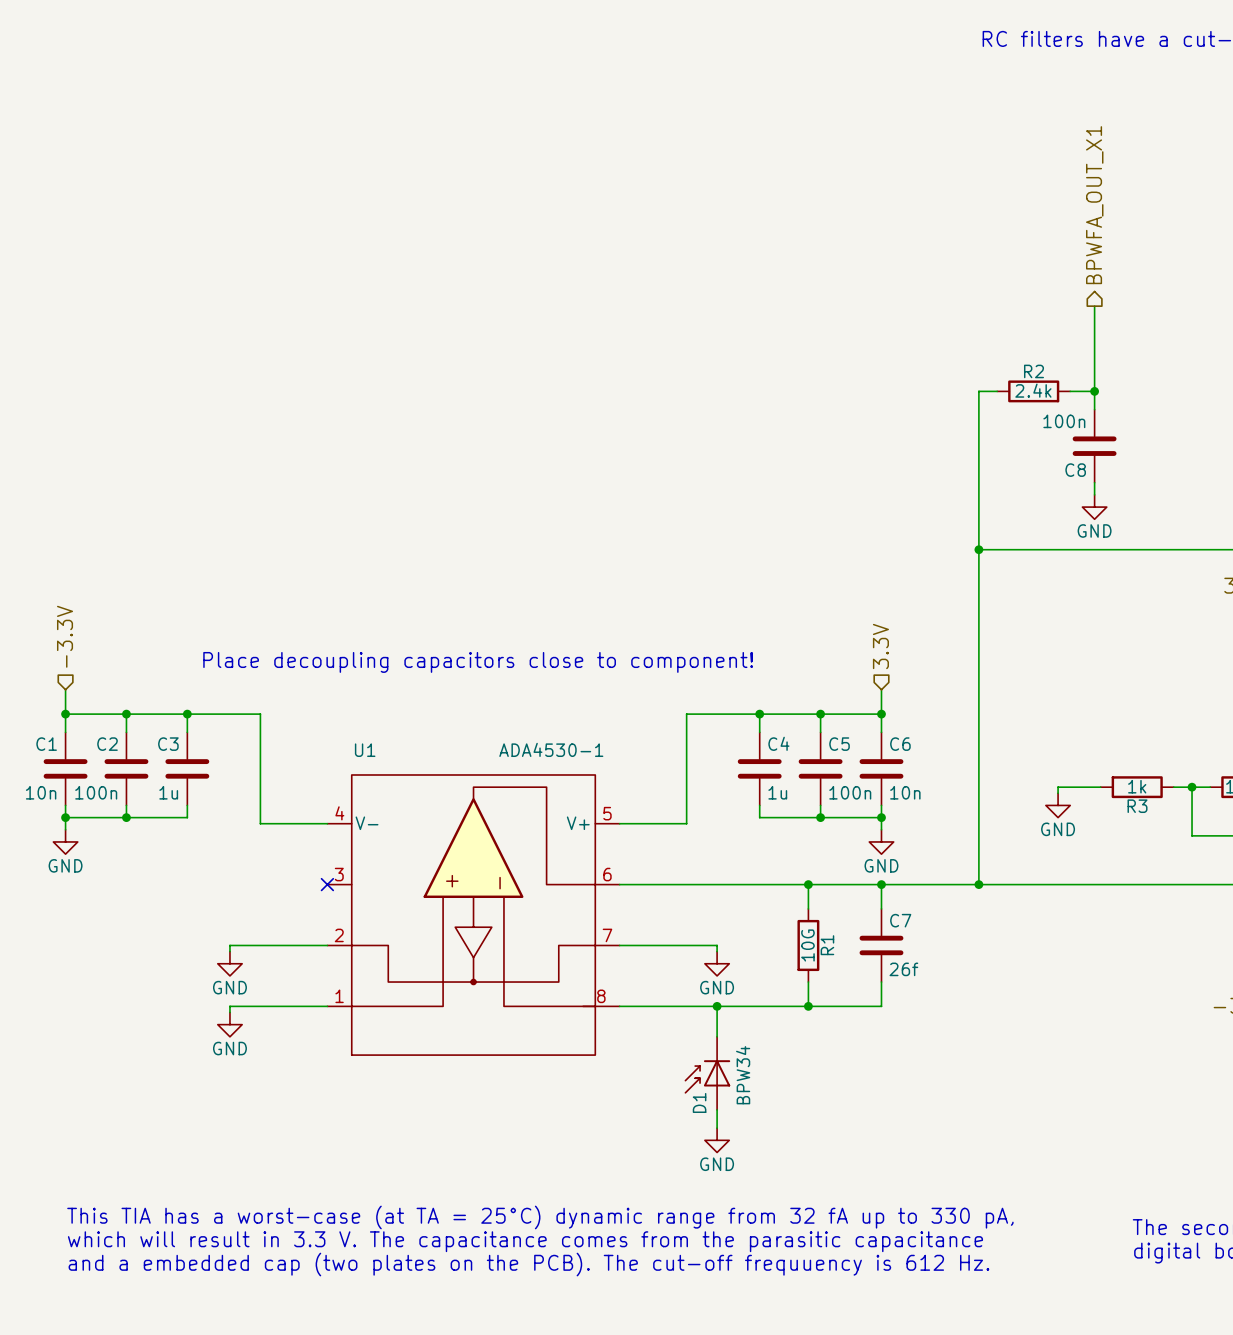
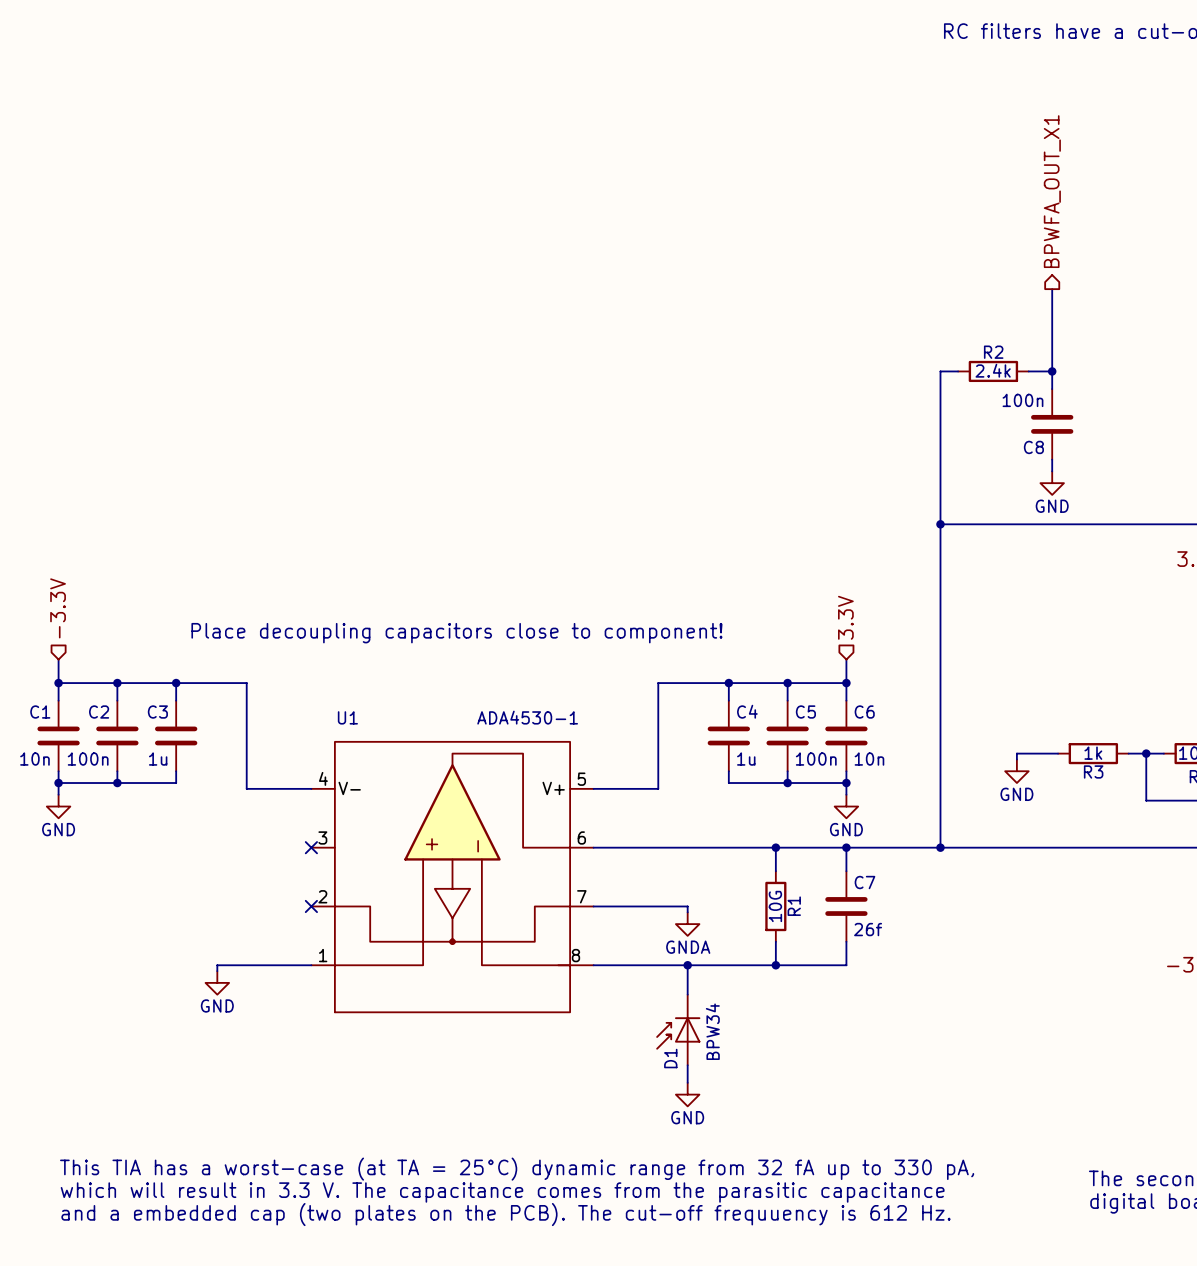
wire: (327, 945) (229, 945) (229, 951) -> none
no-connect mark: none -> (311, 906)
power symbol: GND (229, 963) -> none
power symbol: GND (717, 963) -> GNDA (687, 924)

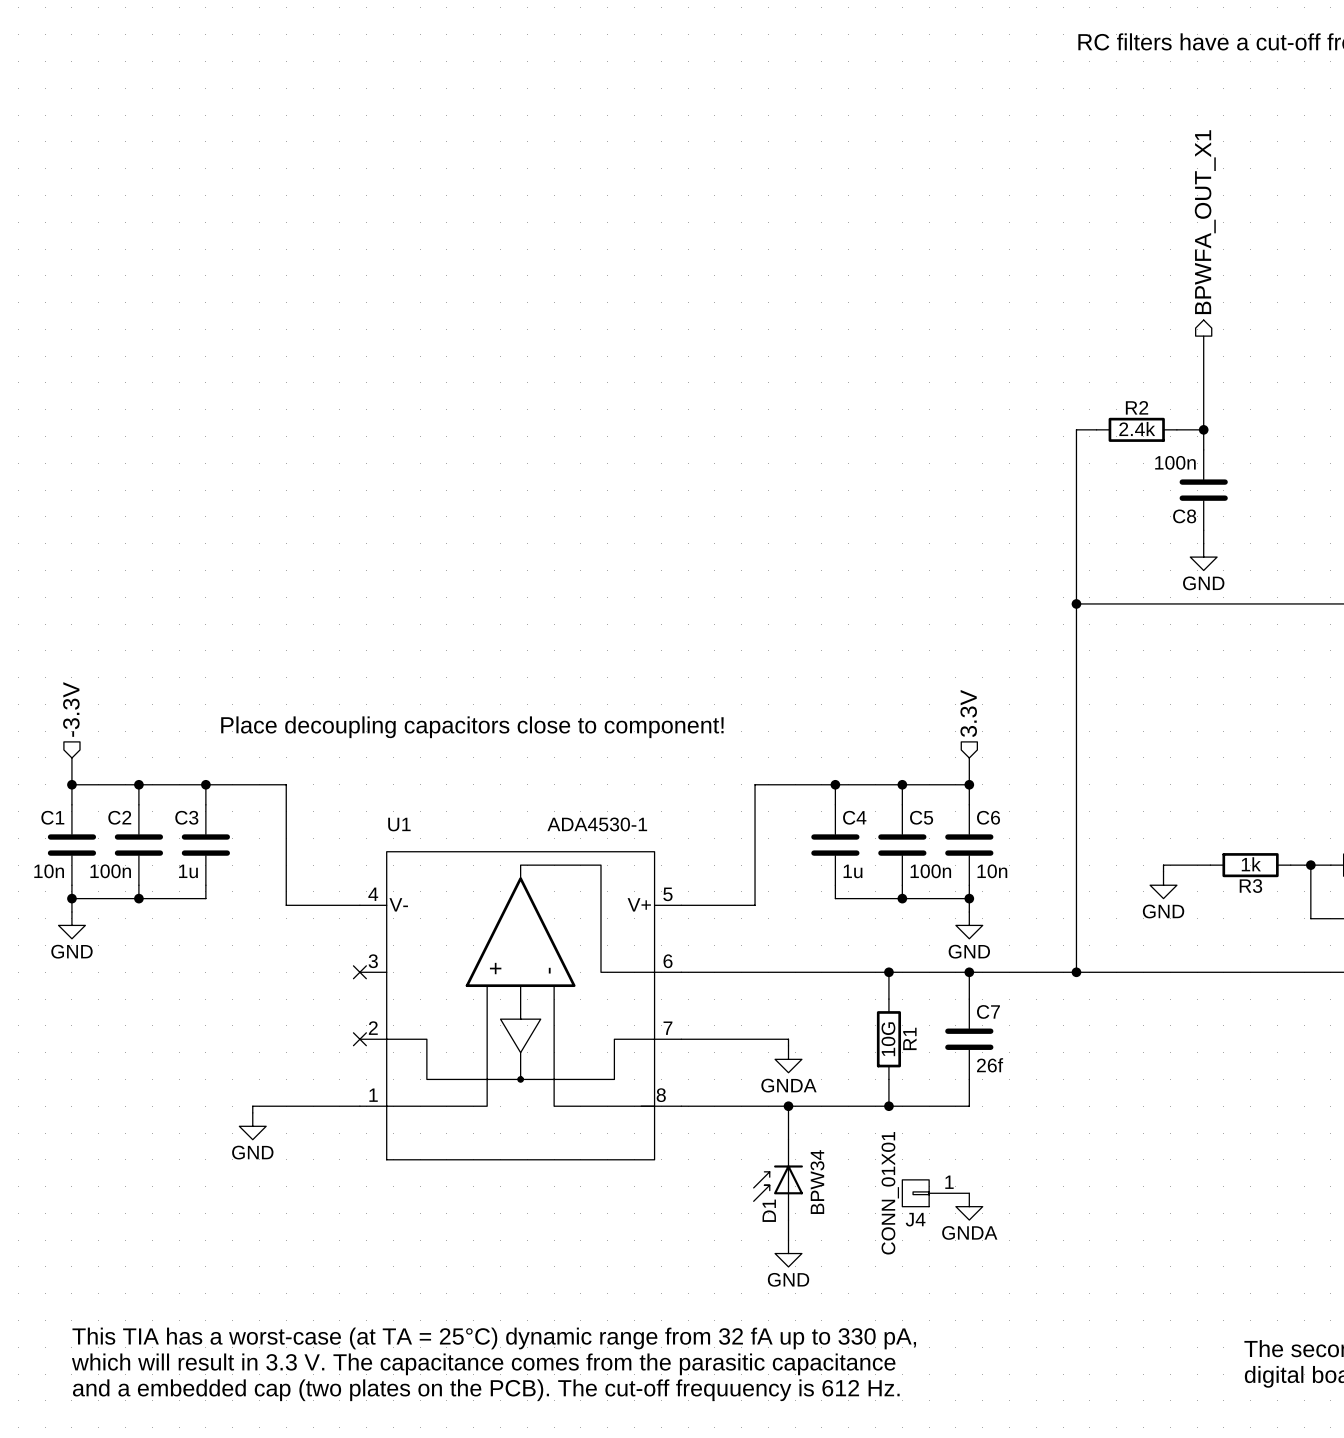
J4: none -> CONN_01X01 (935, 1193)
power symbol: none -> GNDA (969, 1206)

